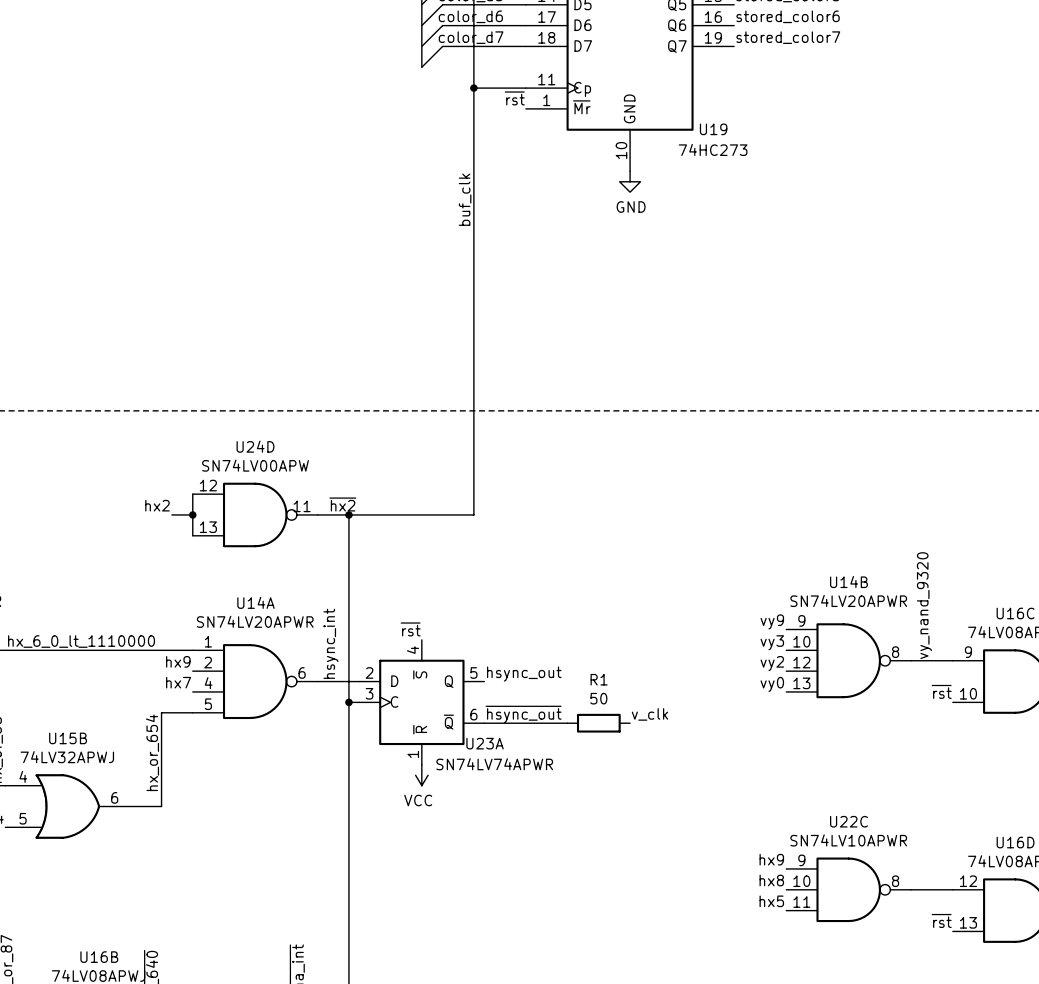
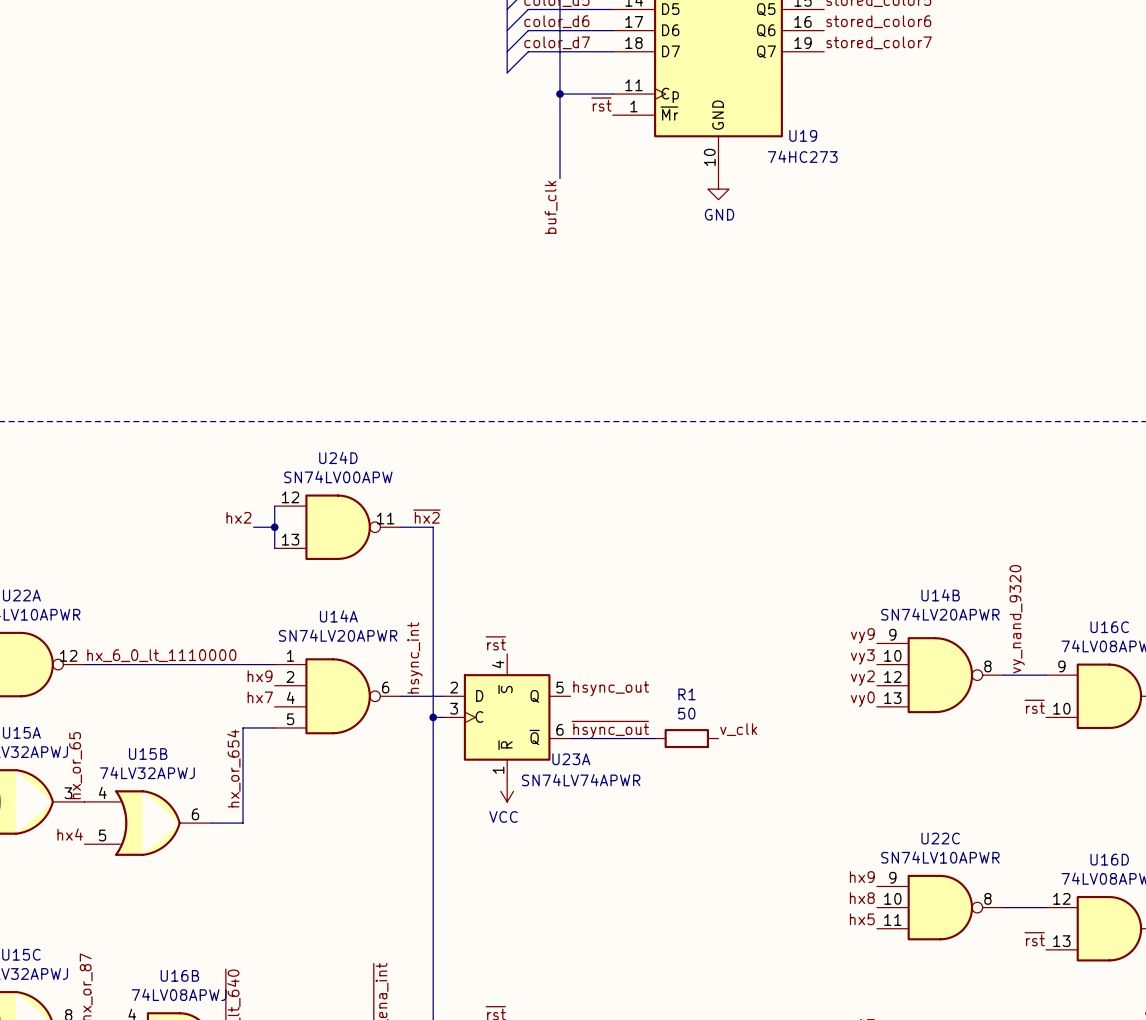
wire: (473, 171) (473, 514) (348, 514) -> none
junction: (348, 514) -> none

